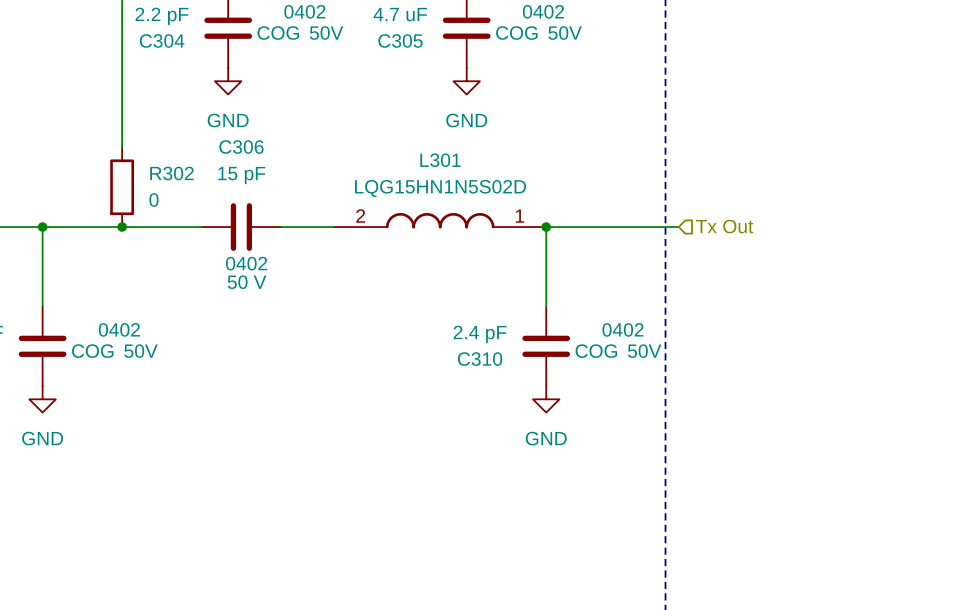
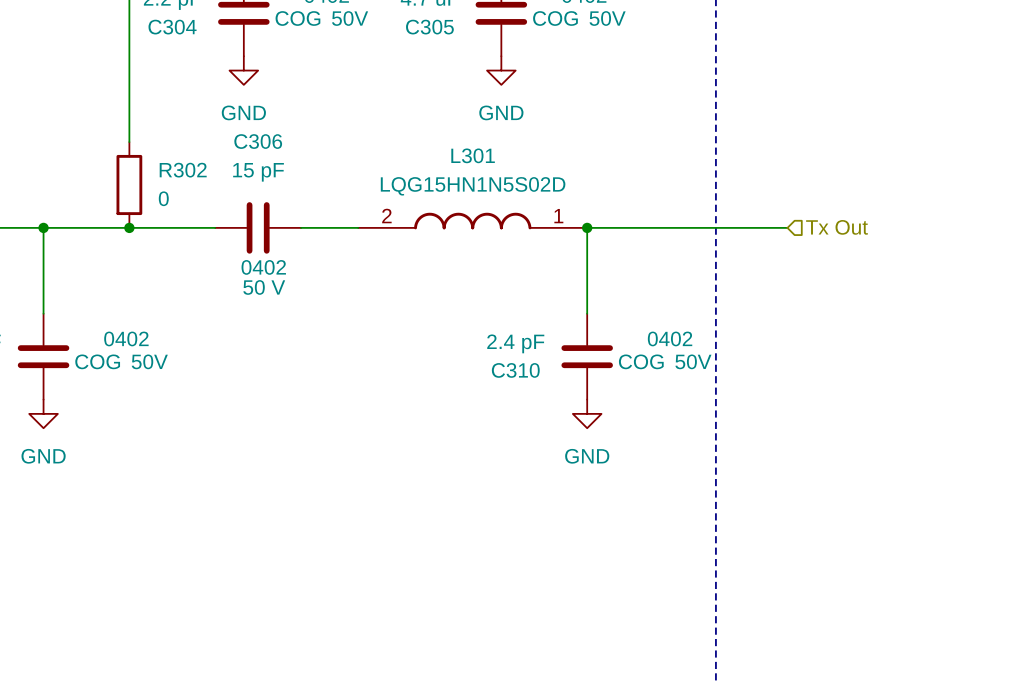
hierarchical label position: Tx Out (724, 226) -> Tx Out (837, 227)
wire: none -> (730, 227) (787, 227)

